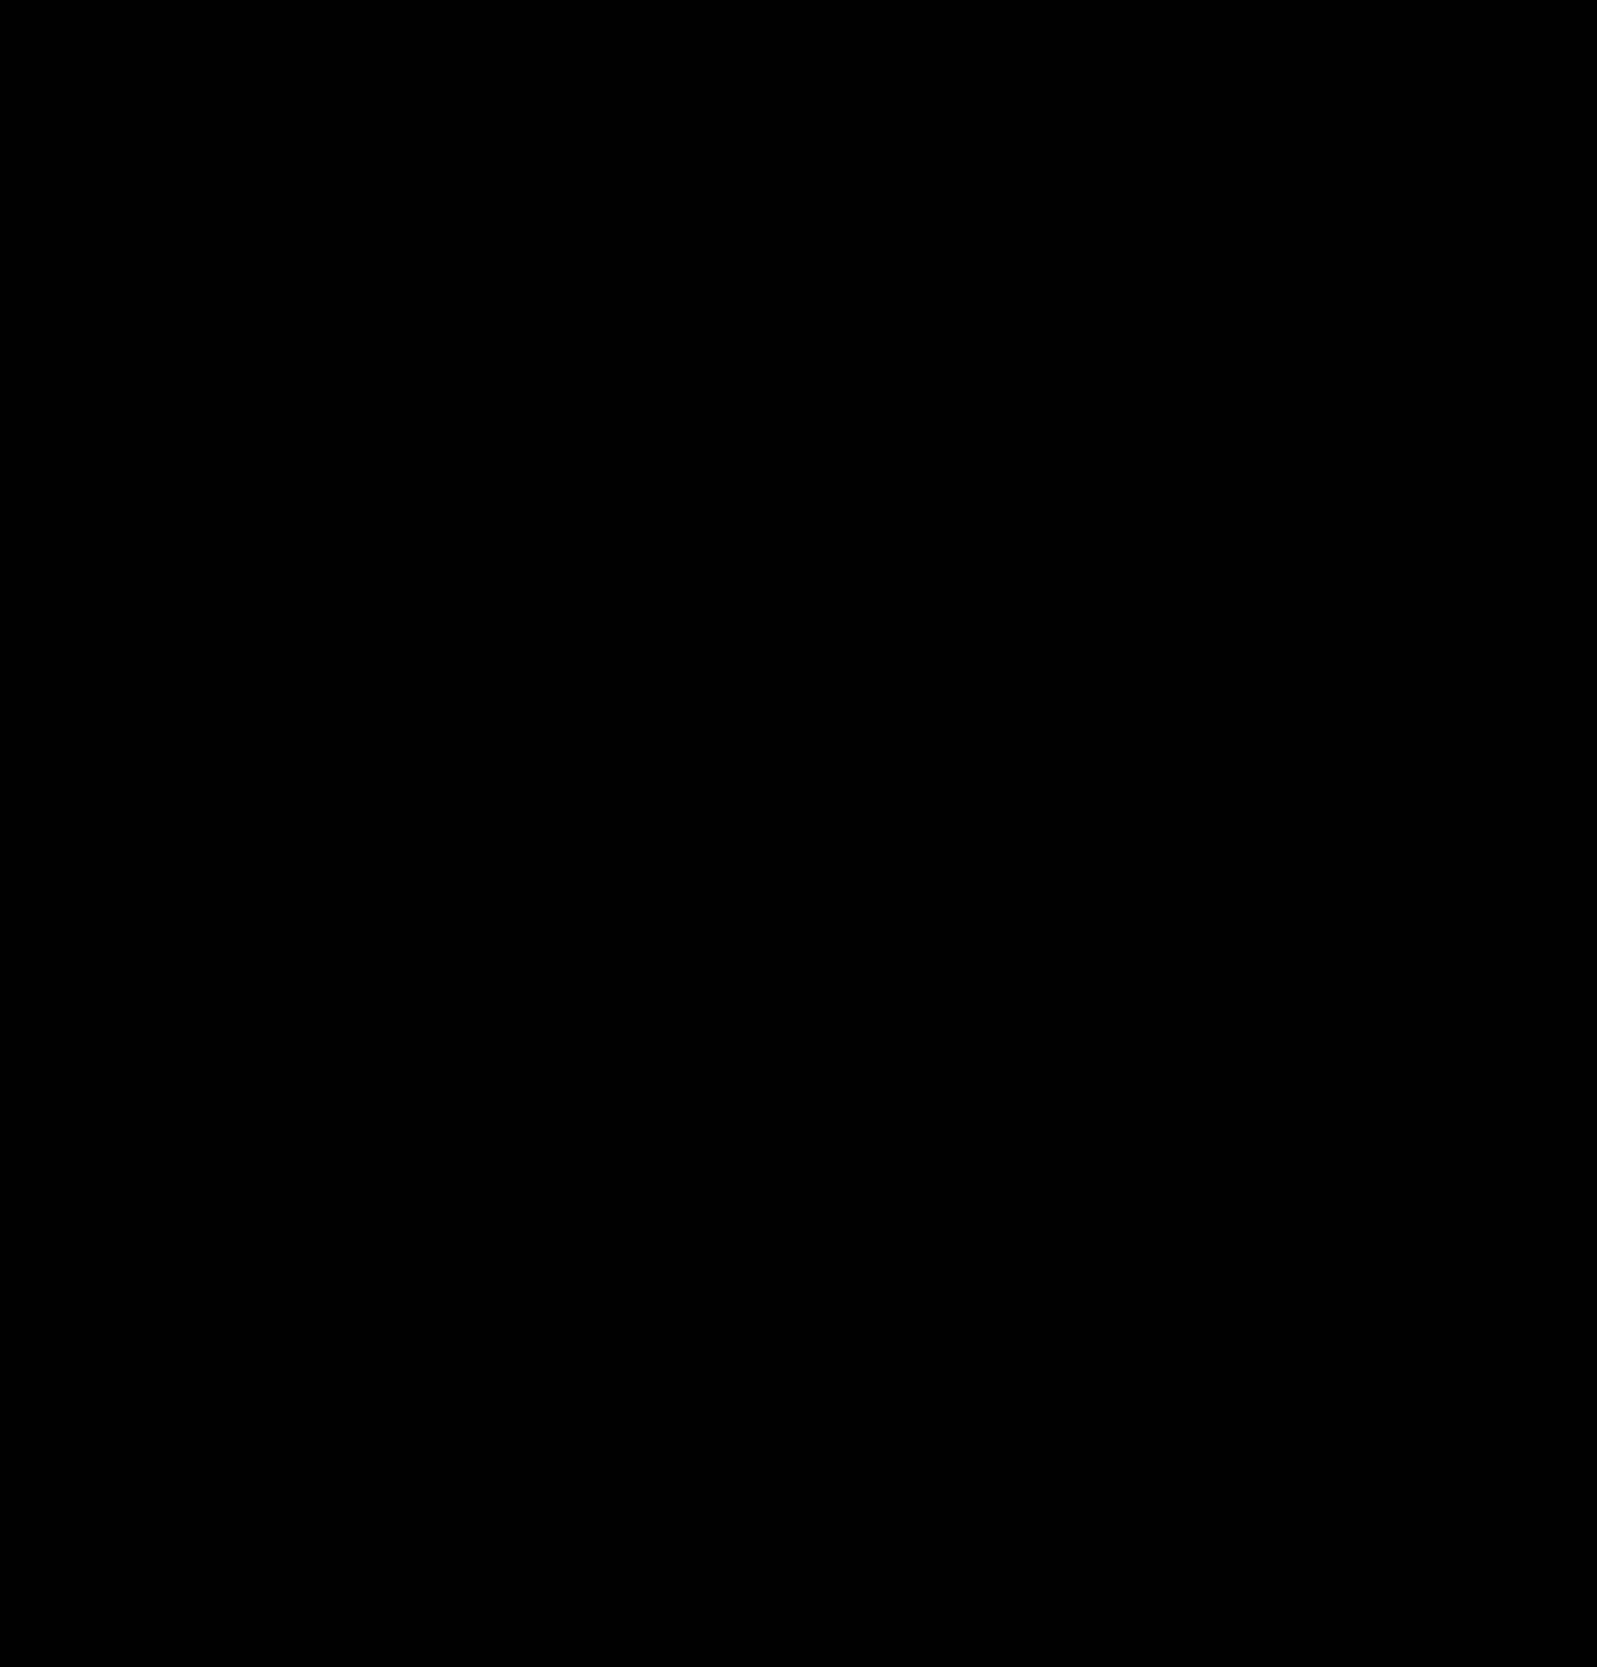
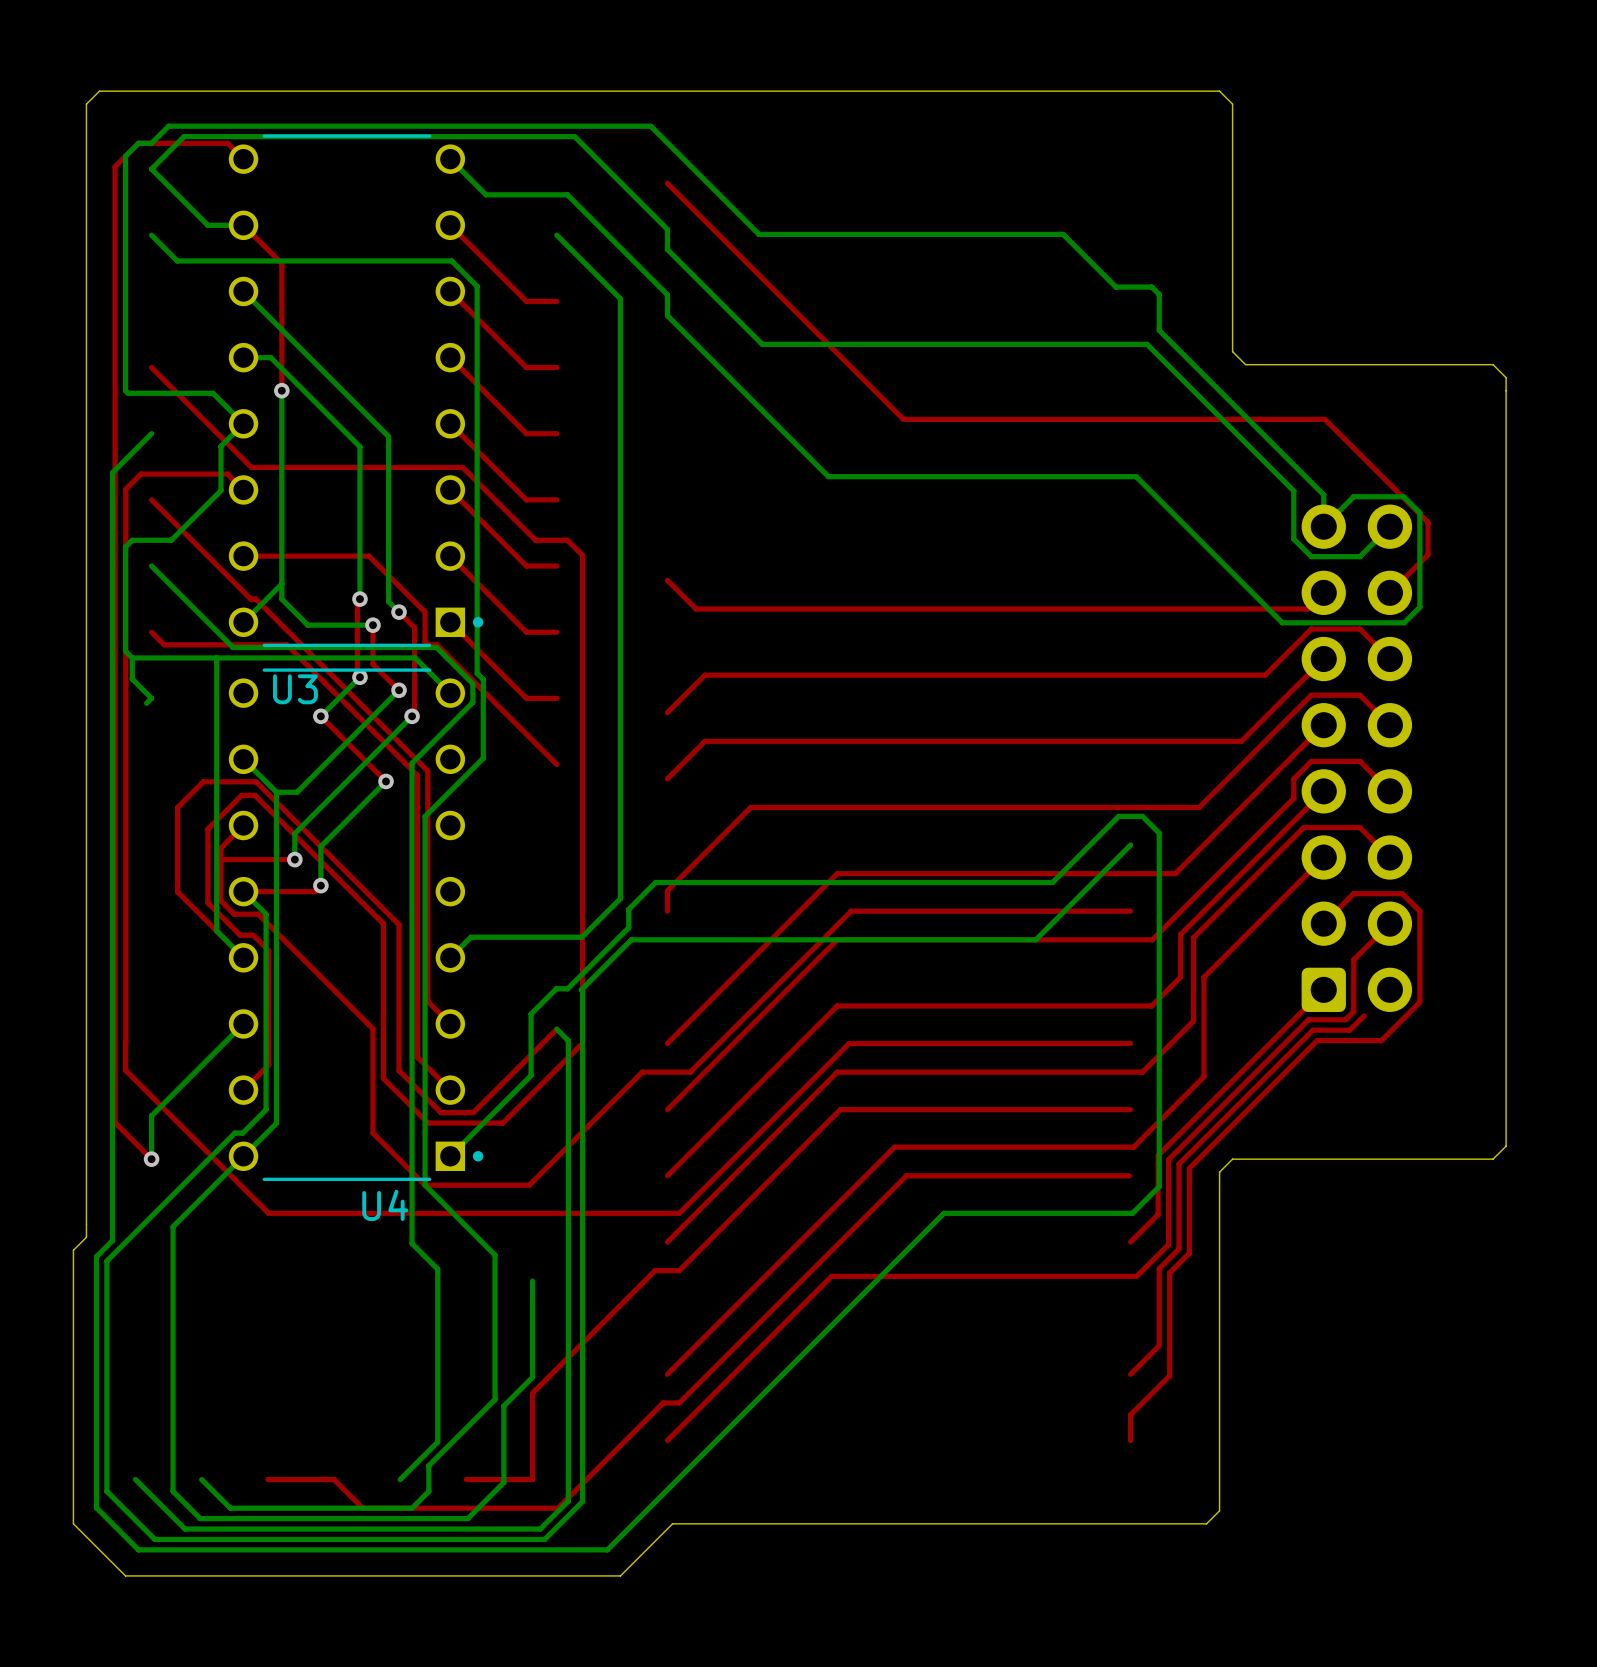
board edge: none -> (1219, 91) (1232, 104) (1232, 351) (1245, 364) (1493, 364) (1506, 377) (1506, 1146) (1493, 1159) (1232, 1159) (1219, 1172) (1219, 1510) (1206, 1523) (672, 1523) (620, 1575) (125, 1575) (73, 1523) (73, 1250) (86, 1237) (86, 104) (99, 91) (1219, 91)
top track: none -> (243, 159) (227, 143) (138, 143) (115, 166) (115, 1122) (151, 1159)
bottom track: none -> (450, 159) (486, 194) (567, 194) (667, 294) (667, 315) (828, 476) (1136, 476) (1282, 622) (1404, 622) (1419, 607) (1419, 512) (1403, 496) (1353, 496) (1323, 526) (1323, 494) (1159, 330) (1159, 294) (1151, 287) (1115, 287) (1063, 234) (759, 234) (650, 126) (168, 126) (151, 143) (138, 143) (125, 156) (125, 390) (128, 393) (213, 393) (243, 423) (220, 446) (220, 490) (171, 540) (132, 540) (125, 547) (125, 651) (132, 657)
top track: none -> (667, 183) (903, 419) (1324, 419) (1427, 522) (1427, 554) (1389, 592)
top track: none -> (243, 225) (281, 263) (281, 390)
bottom track: none -> (243, 225) (207, 225) (151, 169) (184, 136) (574, 136) (667, 229) (667, 249) (762, 344) (1147, 344) (1293, 491) (1293, 539) (1311, 556) (1359, 556) (1389, 526)
top track: none -> (450, 225) (526, 301) (556, 301)
bottom track: none -> (151, 235) (177, 260) (451, 260) (477, 286) (477, 673) (483, 679) (483, 758) (425, 816) (425, 1185) (495, 1255) (495, 1399) (428, 1465) (428, 1491) (412, 1508) (230, 1508) (201, 1479)
bottom track: none -> (556, 235) (620, 298) (620, 898) (581, 937) (470, 937) (450, 957)
bottom track: none -> (243, 291) (388, 436) (388, 601) (399, 612)
top track: none -> (450, 291) (526, 367) (556, 367)
bottom track: none -> (243, 357) (270, 357) (359, 446) (359, 599)
top track: none -> (450, 357) (526, 433) (556, 433)
top track: none -> (151, 367) (251, 467) (462, 467) (535, 540) (567, 540) (582, 555) (582, 1043) (502, 1123) (428, 1123) (383, 1078) (383, 923) (254, 795) (241, 795) (207, 829) (207, 902) (240, 935) (253, 935) (268, 950) (268, 1064) (243, 1090)
bottom track: none -> (281, 390) (281, 599) (307, 625) (372, 625)
via: none -> (281, 390)
U3: none -> (356, 390)
top track: none -> (450, 423) (526, 499) (556, 499)
bottom track: none -> (151, 433) (112, 472) (112, 1240) (96, 1256) (96, 1507) (138, 1549) (607, 1549) (943, 1213) (1132, 1213) (1159, 1186) (1159, 833) (1142, 816) (1118, 816) (1052, 882) (655, 882) (628, 909) (628, 927) (567, 988) (556, 988) (531, 1014) (531, 1075) (450, 1156)
top track: none -> (243, 489) (227, 474) (140, 474) (125, 489) (125, 1041)
top track: none -> (450, 489) (526, 566) (556, 566)
top track: none -> (151, 499) (250, 599) (255, 599) (427, 771) (427, 1001) (450, 1023)
top track: none -> (243, 556) (369, 556) (425, 612) (425, 642) (427, 644) (437, 644) (556, 764)
top track: none -> (450, 556) (526, 632) (556, 632)
bottom track: none -> (151, 566) (233, 647) (436, 647) (472, 683) (472, 702) (412, 763) (412, 1243) (437, 1269) (437, 1442) (400, 1479)
top track: none -> (667, 580) (696, 609) (1307, 609) (1323, 592)
bottom track: none -> (281, 584) (243, 622)
top track: none -> (359, 599) (357, 601) (357, 674) (359, 677)
via: none -> (359, 599)
top track: none -> (399, 612) (414, 627) (414, 713) (412, 716)
via: none -> (399, 612)
top track: none -> (450, 622) (526, 698) (556, 698)
top track: none -> (372, 625) (372, 664) (399, 690)
via: none -> (372, 625)
top track: none -> (151, 632) (164, 644) (286, 644) (417, 775) (417, 1057) (450, 1090)
bottom track: none -> (132, 657) (132, 679) (151, 698) (146, 703)
bottom track: none -> (132, 657) (415, 657) (450, 693)
bottom track: none -> (216, 657) (216, 930) (243, 957)
top track: none -> (1323, 659) (1241, 741) (704, 741) (667, 778)
top track: none -> (1389, 659) (1359, 629) (1311, 629) (1265, 675) (704, 675) (667, 712)
bottom track: none -> (359, 677) (320, 716)
via: none -> (359, 677)
bottom track: none -> (399, 690) (297, 792) (276, 792)
via: none -> (399, 690)
top track: none -> (320, 716) (386, 781)
via: none -> (320, 716)
bottom track: none -> (412, 716) (294, 833) (294, 859)
via: none -> (412, 716)
top track: none -> (1323, 725) (1175, 873) (837, 873) (667, 1043)
top track: none -> (1389, 725) (1359, 695) (1311, 695) (1199, 807) (750, 807) (667, 890) (667, 911)
part: none -> (1356, 758)
bottom track: none -> (243, 759) (276, 792)
bottom track: none -> (386, 781) (320, 846) (320, 885)
via: none -> (386, 781)
top track: none -> (1323, 791) (1180, 934) (1180, 977) (1151, 1005) (837, 1005) (667, 1175)
top track: none -> (1389, 791) (1359, 761) (1311, 761) (1293, 778) (1293, 798) (1152, 939) (837, 939) (667, 1109)
bottom track: none -> (276, 792) (276, 1123) (173, 1226) (173, 1491) (200, 1518) (467, 1518) (503, 1482) (503, 1405) (532, 1377) (532, 1281)
top track: none -> (243, 825) (220, 848) (220, 900) (234, 914) (258, 914) (372, 1028) (372, 1133) (425, 1185) (529, 1185) (642, 1072) (690, 1072) (851, 911) (1130, 911)
bottom track: none -> (1130, 845) (1035, 939) (631, 939) (581, 989) (582, 1501) (544, 1539) (154, 1539) (106, 1491) (106, 1261) (234, 1133) (242, 1133) (266, 1109) (266, 914) (243, 891)
top track: none -> (1323, 857) (1203, 977) (1203, 1076) (1133, 1147) (894, 1147) (667, 1374)
top track: none -> (1389, 857) (1359, 827) (1303, 827) (1193, 937) (1193, 1021) (1142, 1072) (837, 1072) (667, 1241)
top track: none -> (294, 859) (220, 859)
via: none -> (294, 859)
top track: none -> (320, 885) (314, 891) (243, 891)
via: none -> (320, 885)
top track: none -> (1323, 923) (1353, 893) (1402, 893) (1419, 911) (1419, 1002) (1381, 1040) (1317, 1040) (1189, 1168) (1189, 1253) (1169, 1272) (1169, 1375) (1130, 1414) (1130, 1440)
top track: none -> (1389, 923) (1353, 959) (1353, 1011) (1345, 1019) (1308, 1019) (1168, 1159) (1168, 1244) (1136, 1276) (831, 1276) (667, 1440)
U4: none -> (356, 924)
top track: none -> (243, 957) (177, 891) (177, 807) (203, 781) (256, 781) (399, 924) (399, 1070) (441, 1112) (473, 1112) (556, 1029)
top track: none -> (1323, 989) (1158, 1155) (1158, 1214) (1130, 1241)
top track: none -> (1364, 1015) (1349, 1030) (1312, 1030) (1179, 1164) (1179, 1248) (1159, 1268) (1159, 1345) (1130, 1374)
bottom track: none -> (243, 1023) (151, 1115) (151, 1159)
bottom track: none -> (556, 1029) (568, 1040) (568, 1501) (540, 1529) (185, 1529) (135, 1479)
top track: none -> (125, 1041) (125, 1070) (268, 1213) (679, 1213) (849, 1043) (1130, 1043)
top track: none -> (1130, 1109) (840, 1109) (679, 1270) (655, 1270) (532, 1393) (532, 1479) (466, 1479)
via: none -> (151, 1159)
top track: none -> (1129, 1175) (906, 1175) (679, 1402) (663, 1402) (557, 1508) (362, 1508) (334, 1479) (267, 1479)

